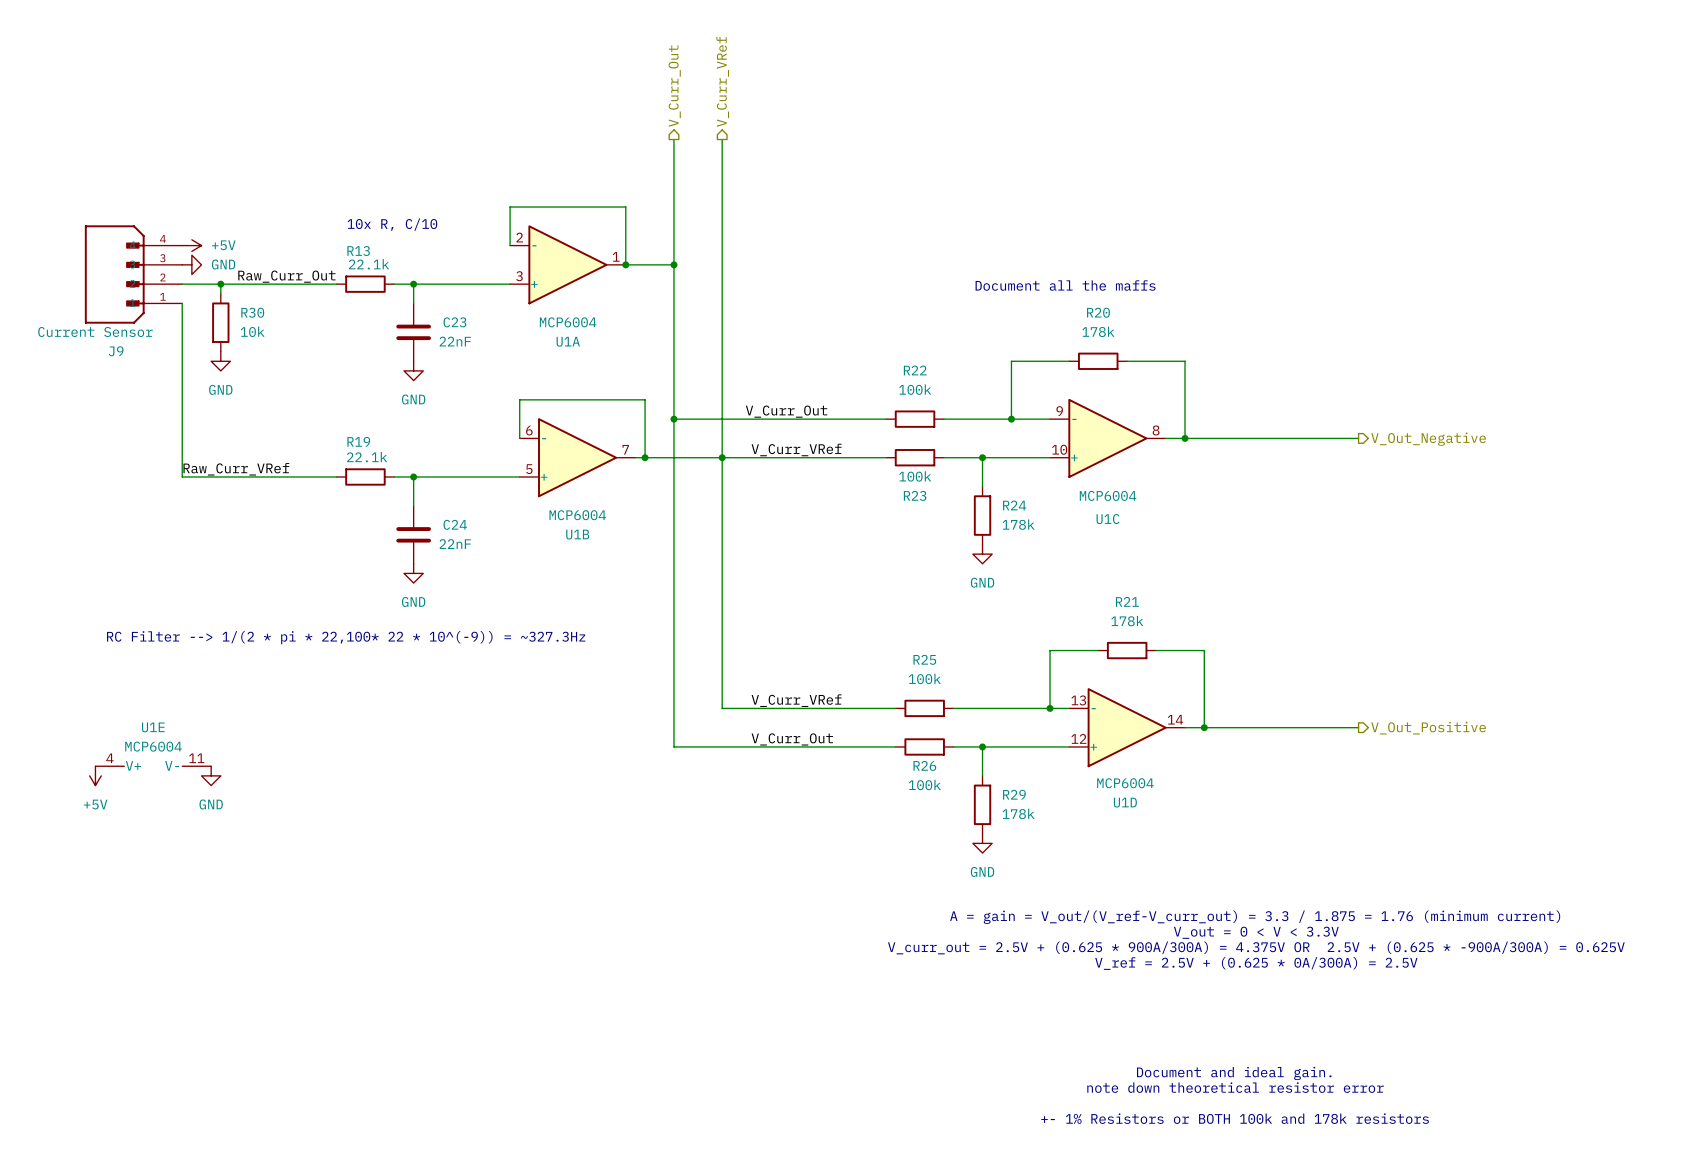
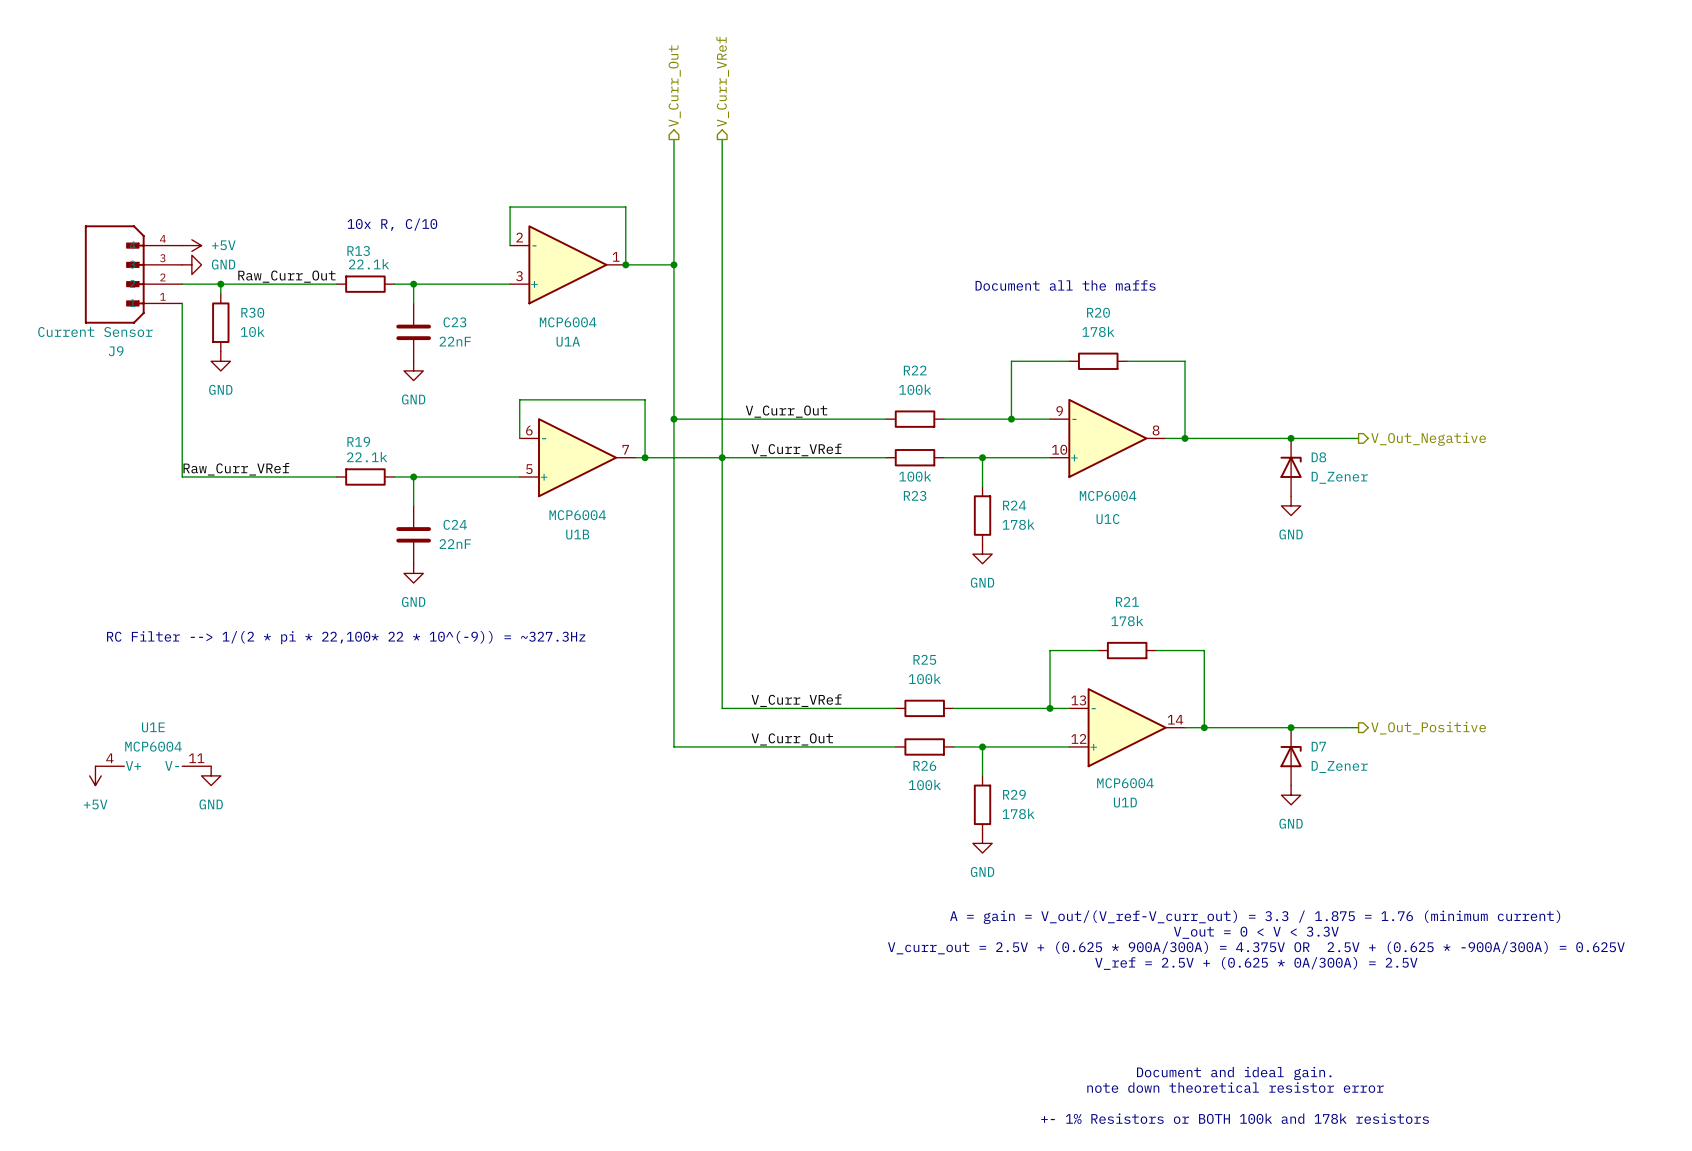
junction: none -> (1291, 438)
D8: none -> D_Zener (1291, 467)
power symbol: none -> GND (1291, 505)
junction: none -> (1291, 727)
D7: none -> D_Zener (1291, 756)
power symbol: none -> GND (1291, 795)

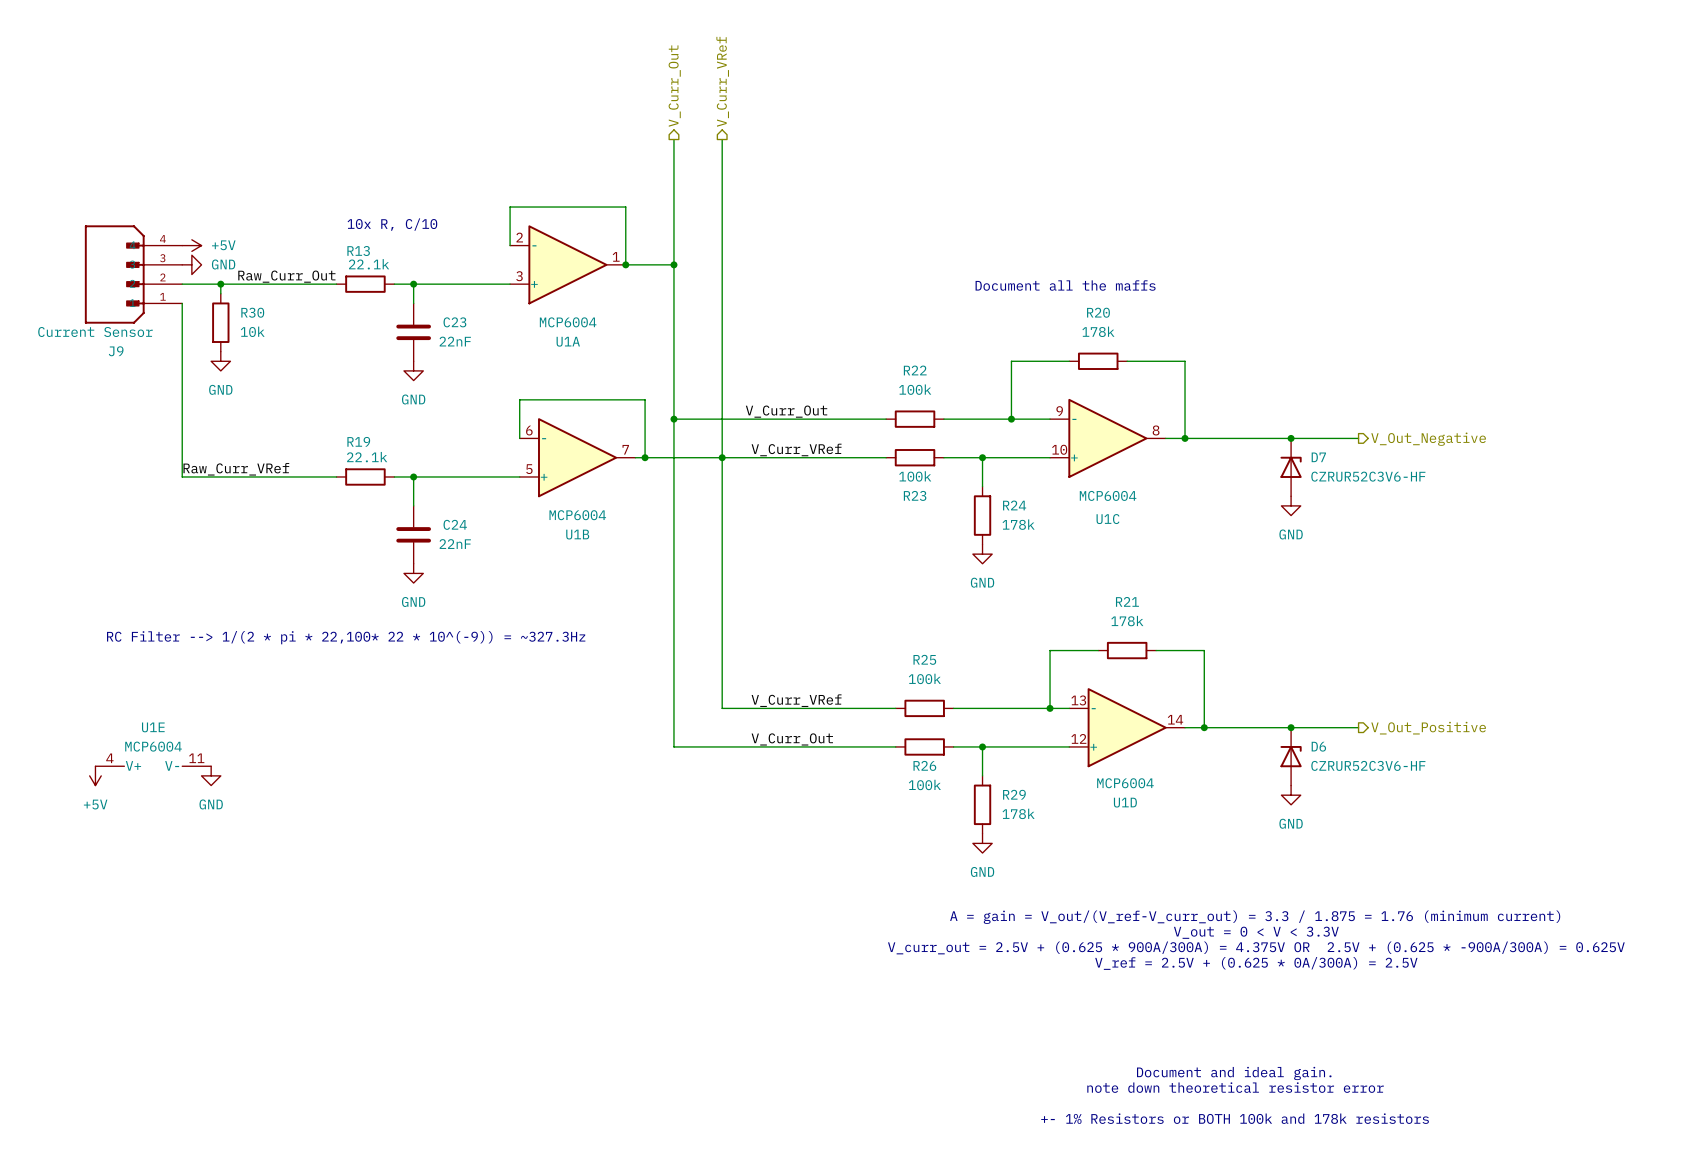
D8 name: D8 (1318, 457) -> D7 (1318, 457)
D8 value: D_Zener (1339, 477) -> CZRUR52C3V6-HF (1368, 476)
D7 name: D7 (1318, 746) -> D6 (1318, 746)
D7 value: D_Zener (1339, 767) -> CZRUR52C3V6-HF (1368, 765)

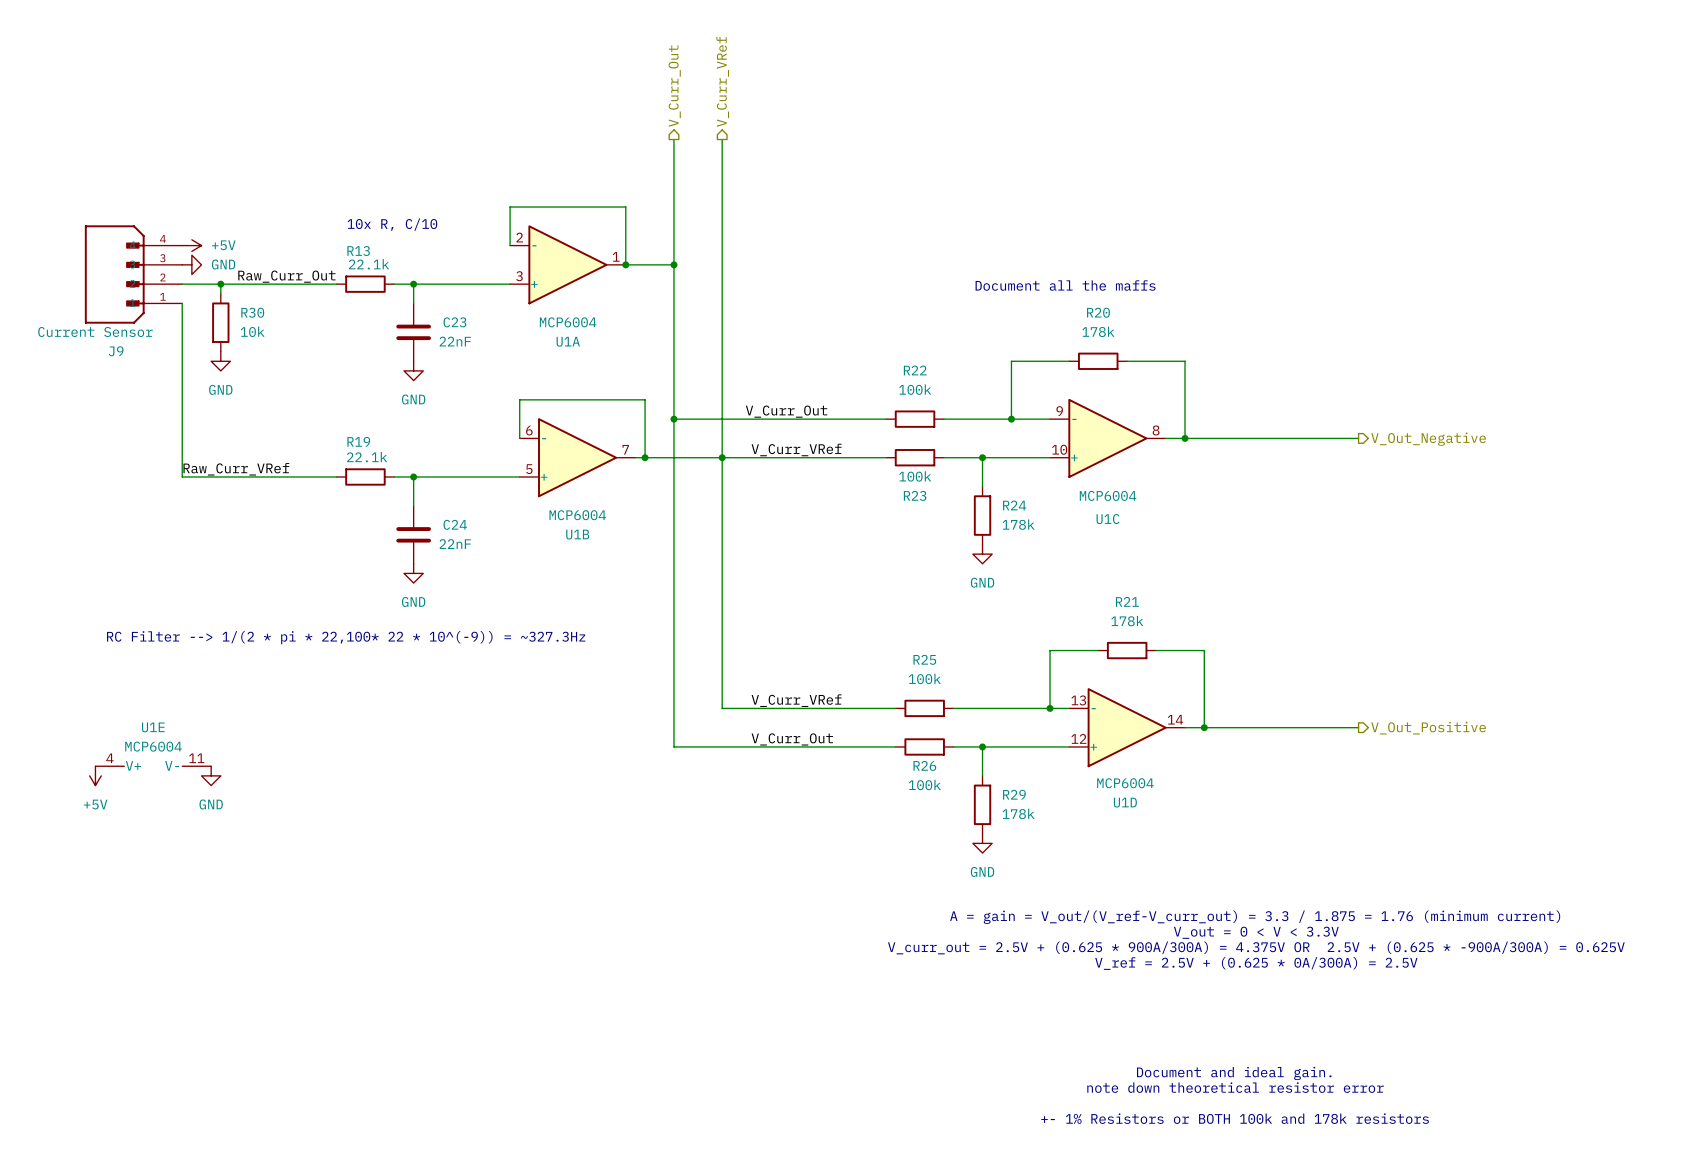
junction: (1291, 438) -> none
D7: CZRUR52C3V6-HF (1291, 467) -> none
power symbol: GND (1291, 505) -> none
junction: (1291, 727) -> none
D6: CZRUR52C3V6-HF (1291, 756) -> none
power symbol: GND (1291, 795) -> none

